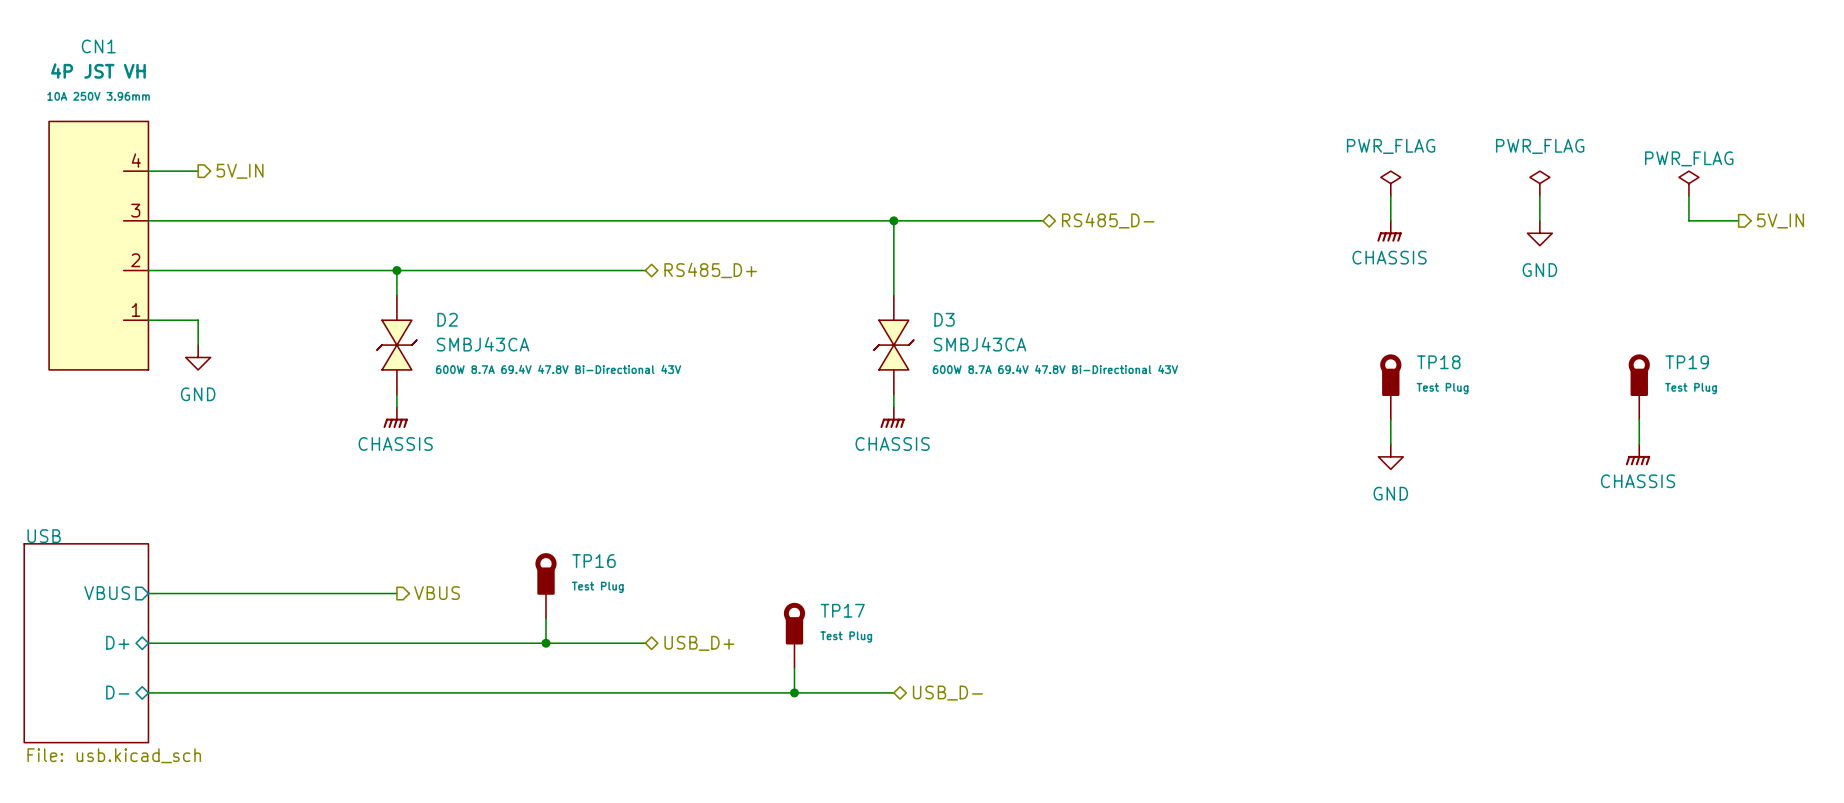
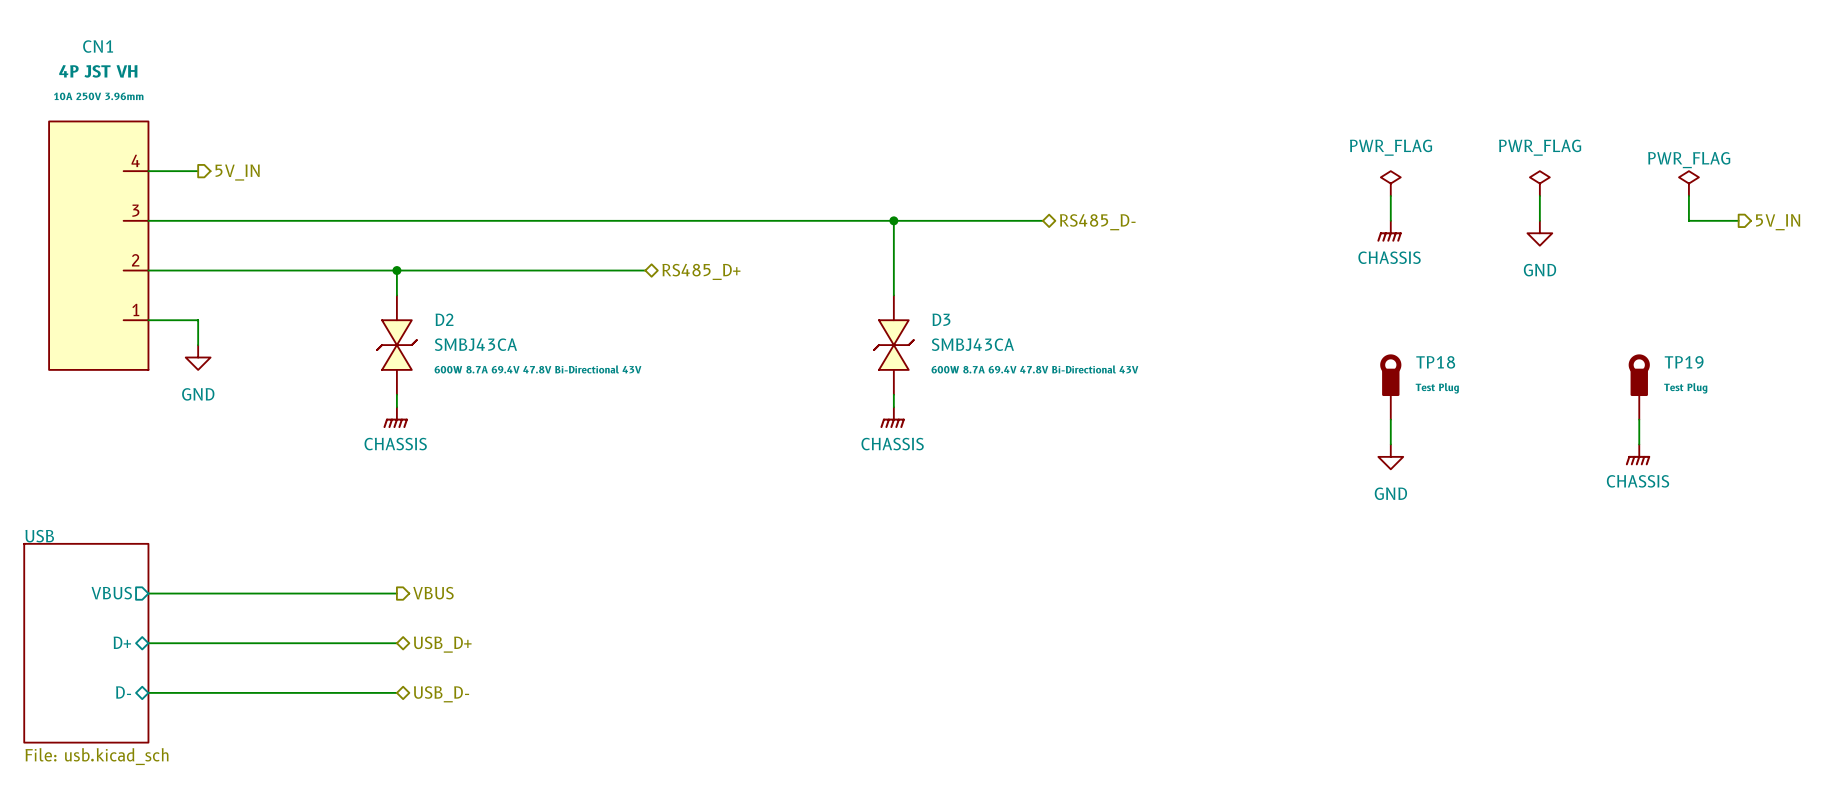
TP16: (546, 585) -> none
wire: (546, 618) (546, 643) -> none
TP17: (794, 635) -> none
wire: (396, 643) (645, 643) -> none
hierarchical label: none -> USB_D+ (442, 644)
junction: (546, 643) -> none
hierarchical label: USB_D+ (699, 643) -> none
wire: (794, 668) (794, 692) -> none
wire: (396, 692) (893, 692) -> none
junction: (794, 692) -> none
hierarchical label: none -> USB_D- (441, 694)
hierarchical label: USB_D- (947, 693) -> none

